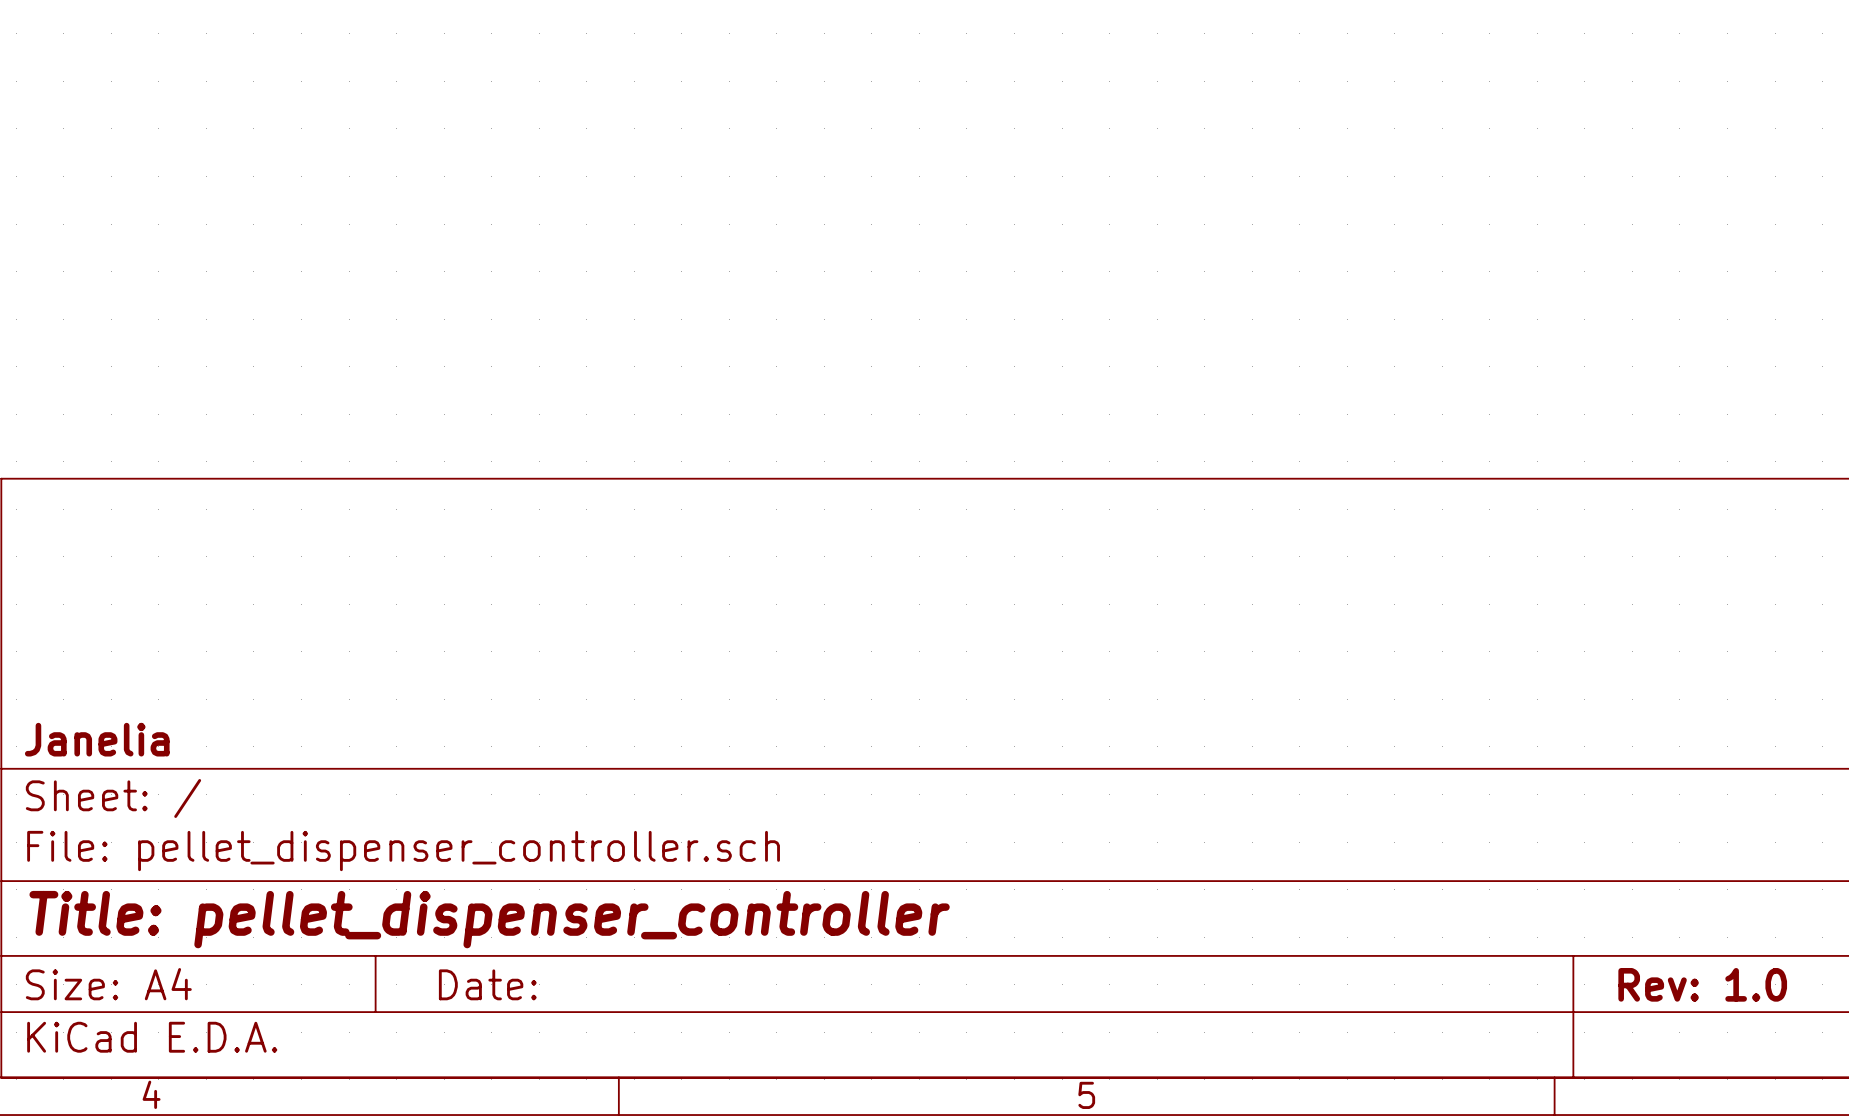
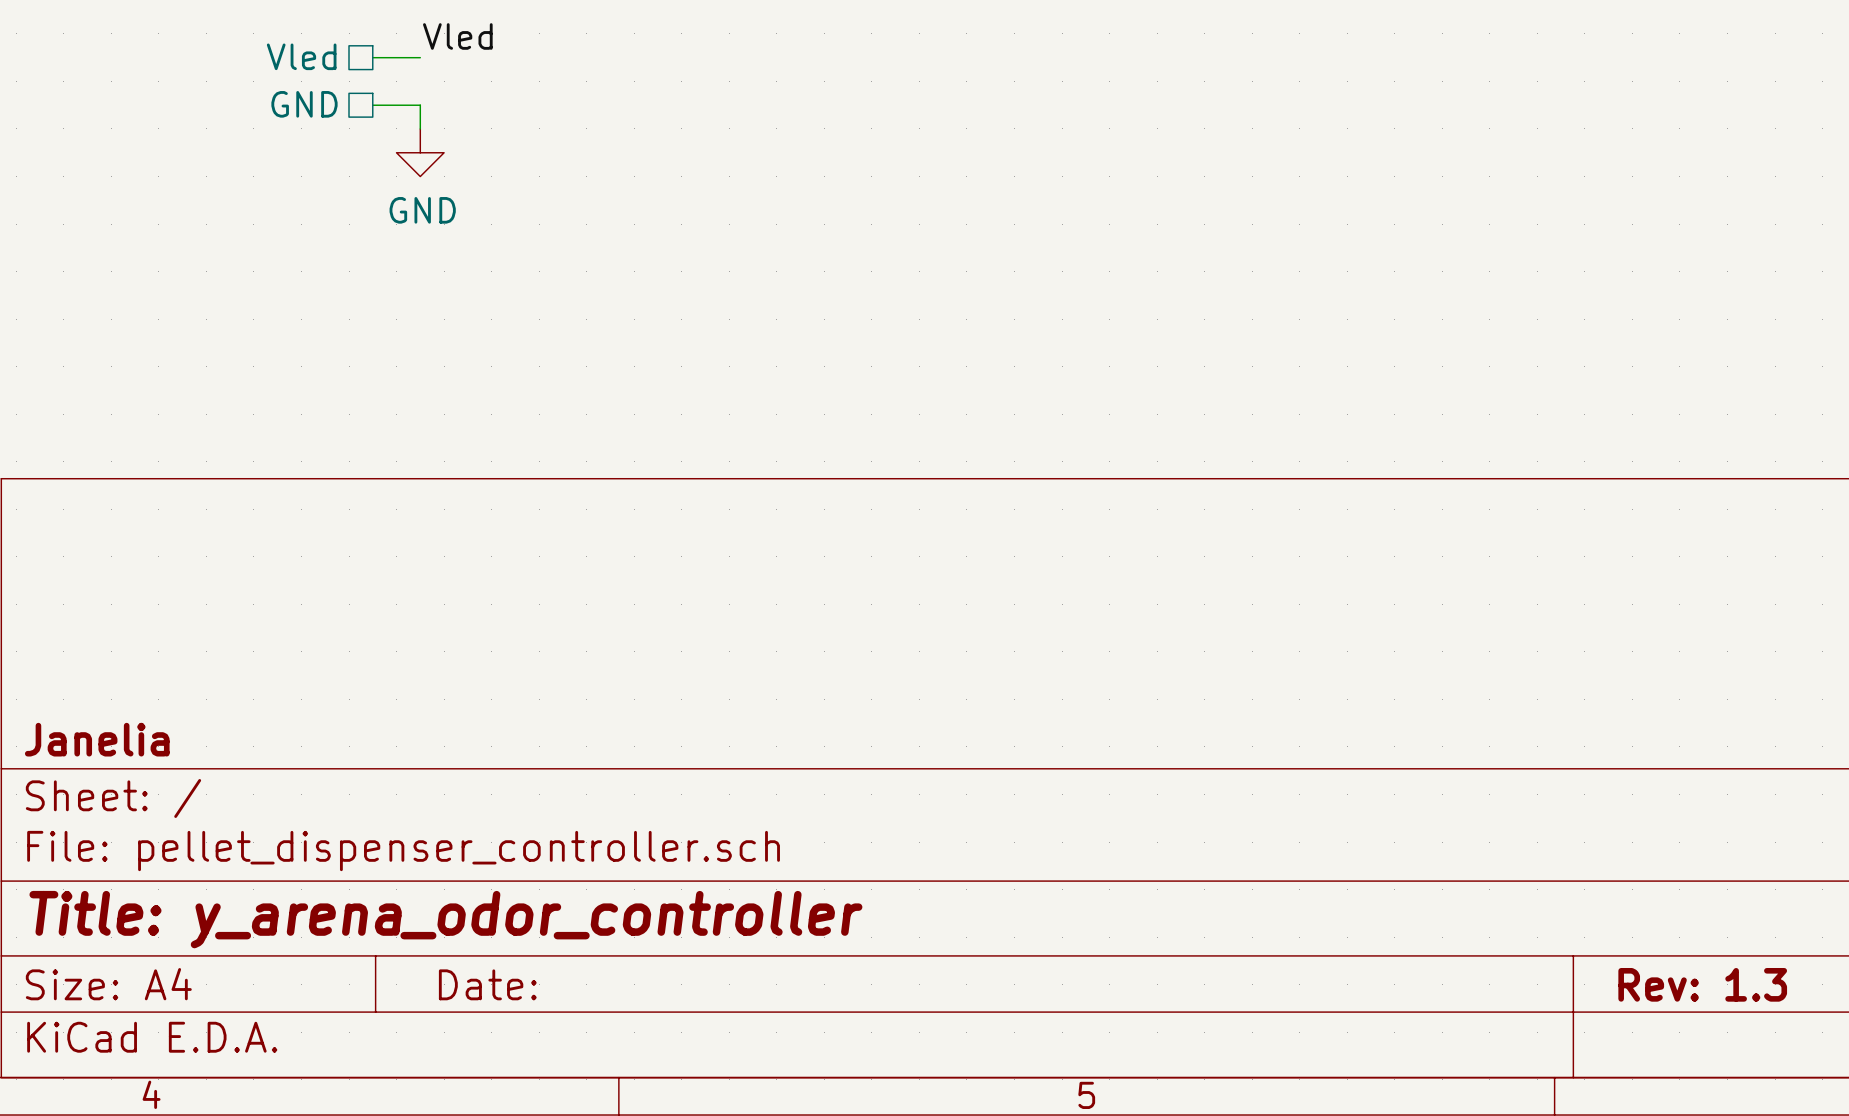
label: none -> Vled (457, 36)
sheet pin: none -> Vled (301, 56)
wire: none -> (372, 57) (420, 57)
sheet pin: none -> GND (304, 104)
wire: none -> (372, 105) (420, 105) (420, 128)
power symbol: none -> GND (420, 152)
title block: Title: pellet_dispenser_controller (489, 919) -> Title: y_arena_odor_controller (445, 919)
title block: Rev: 1.0 (1702, 984) -> Rev: 1.3 (1702, 984)

